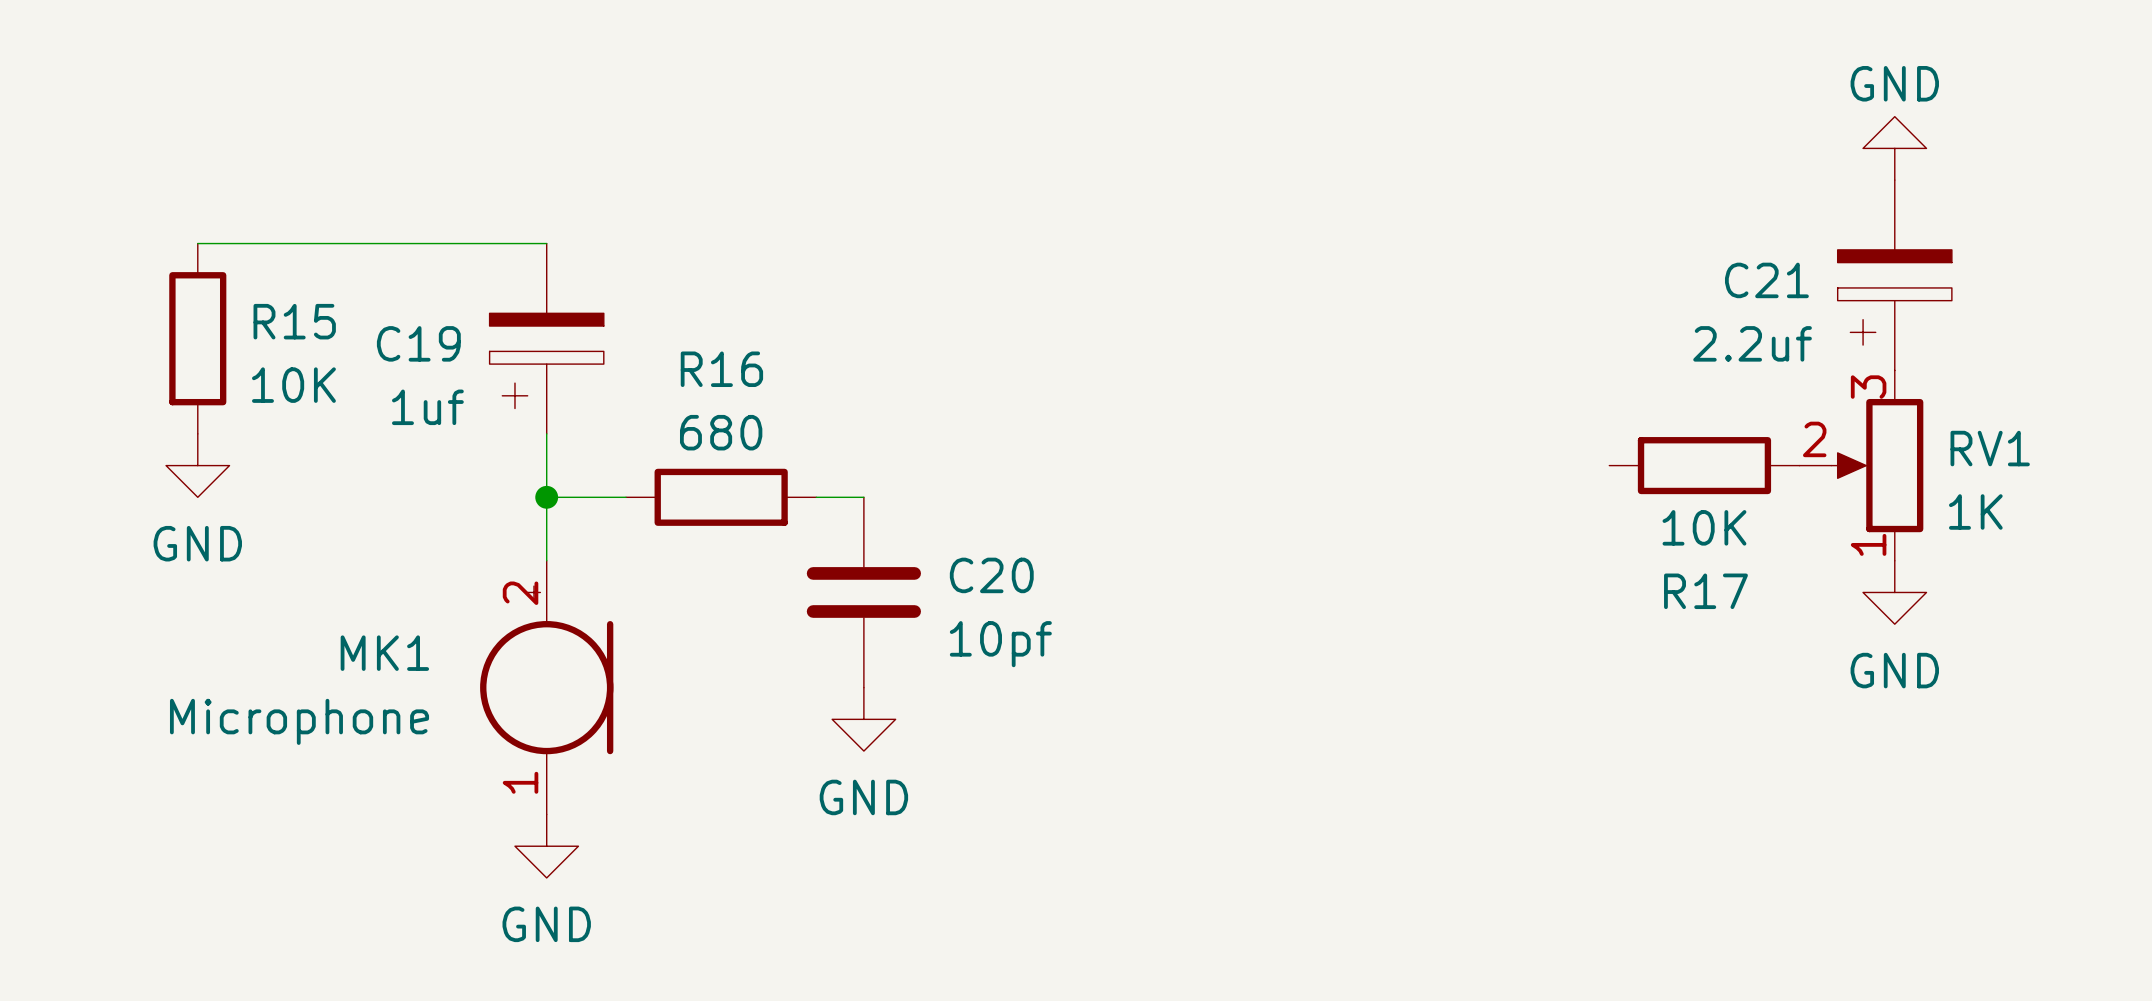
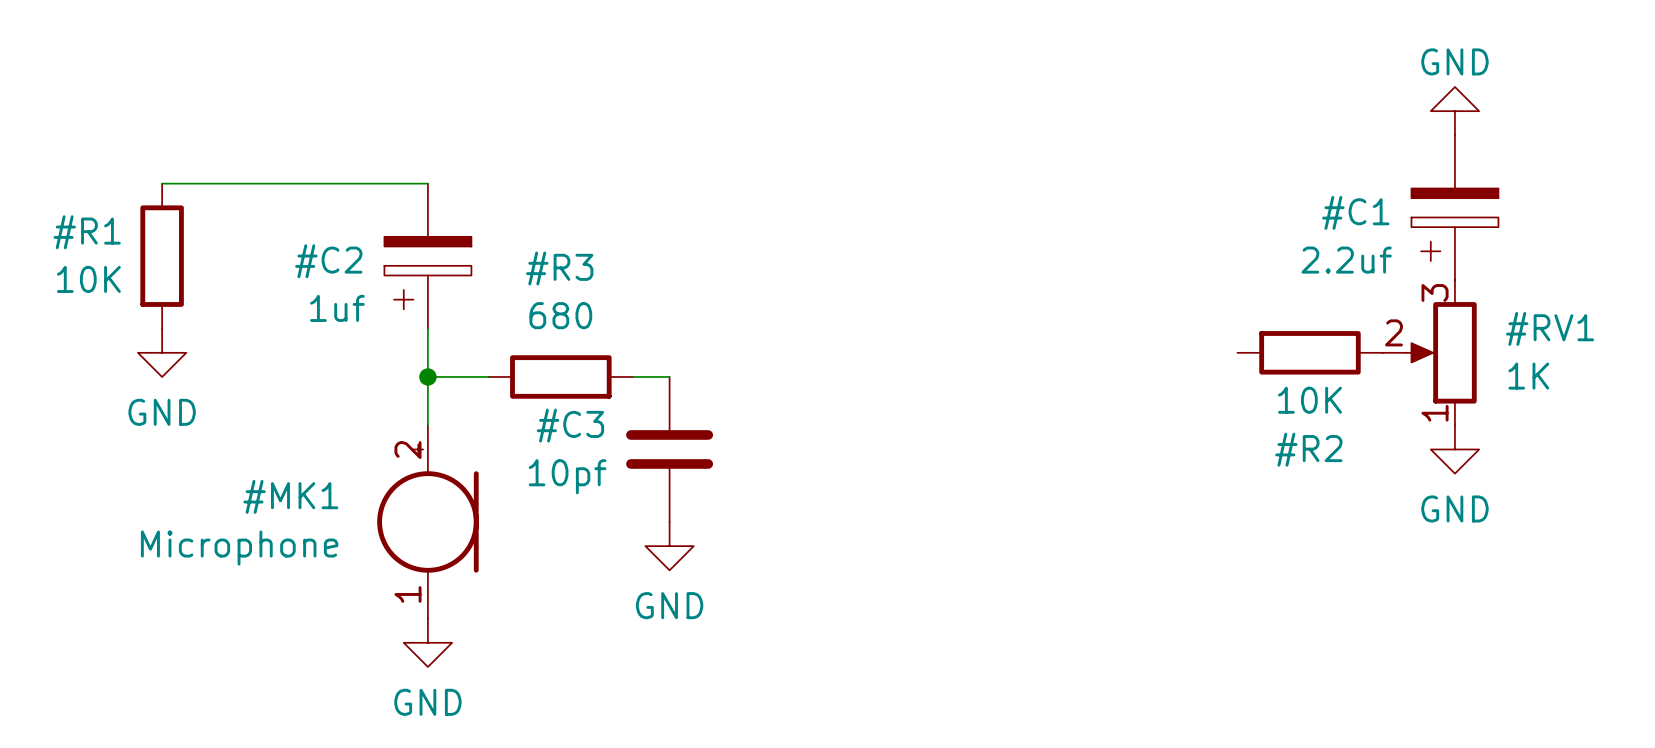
C21: 2.2uf (1894, 275) -> none
#C1: none -> 2.2uf (1454, 207)
R15: 10K (197, 338) -> none
#R1: none -> 10K (162, 256)
C19: 1uf (546, 338) -> none
#C2: none -> 1uf (427, 256)
R17: 10K (1704, 465) -> none
#R2: none -> 10K (1309, 352)
RV1: 1K (1861, 465) -> none
#RV1: none -> 1K (1429, 352)
R16: 680 (721, 497) -> none
#R3: none -> 680 (560, 376)
C20: 10pf (863, 592) -> none
#C3: none -> 10pf (669, 449)
#MK1: none -> Microphone (427, 521)

